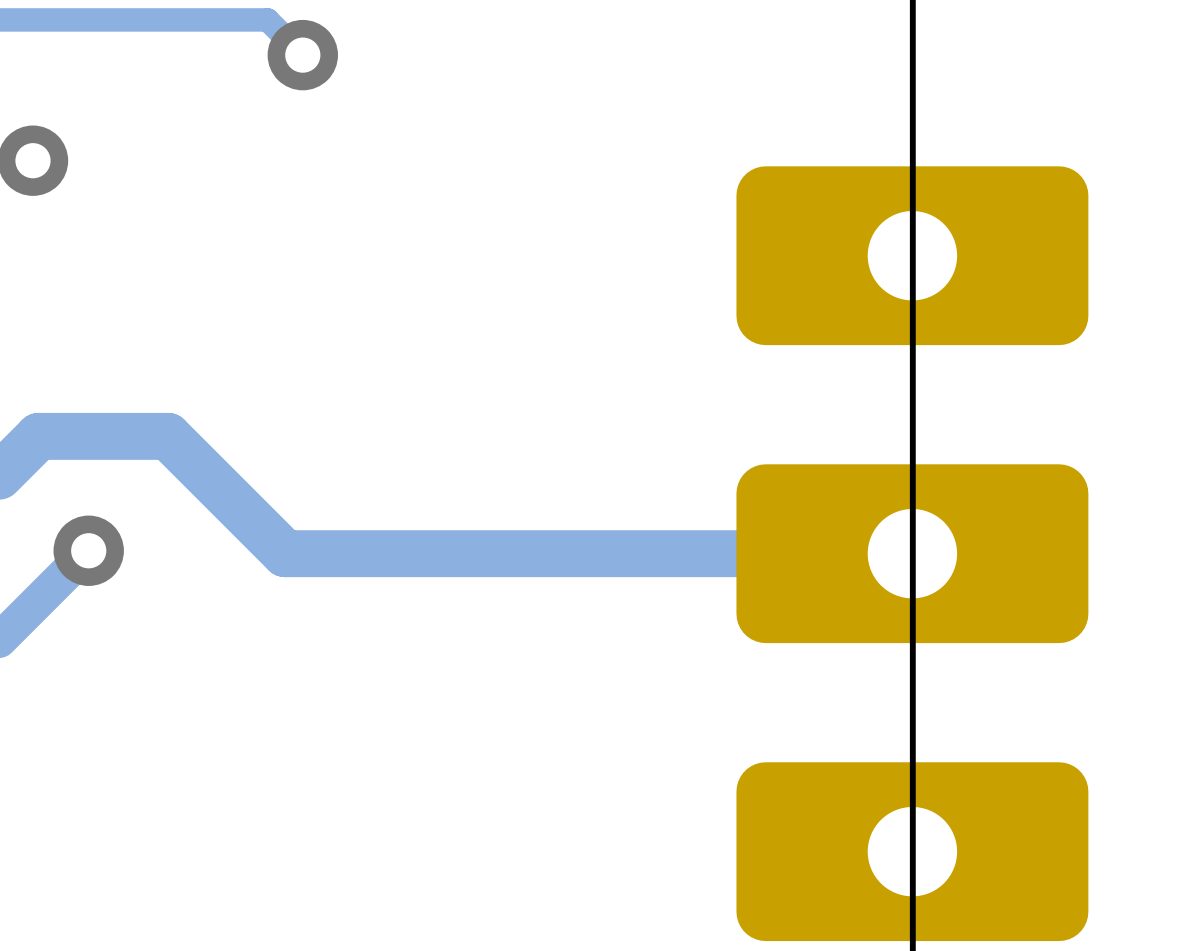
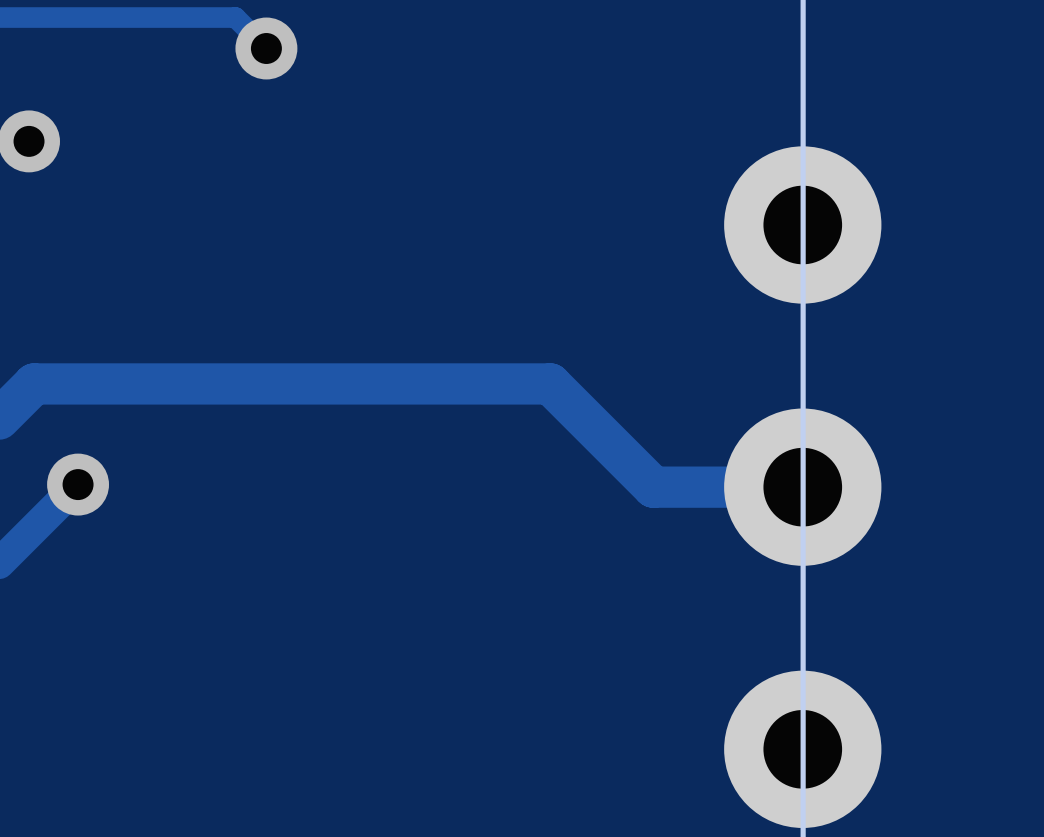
part footprint: [736, 166, 1089, 942] -> [724, 146, 882, 828]
track: (167, 436) (285, 553) (742, 553) -> (147, 383) (550, 383) (653, 487)

